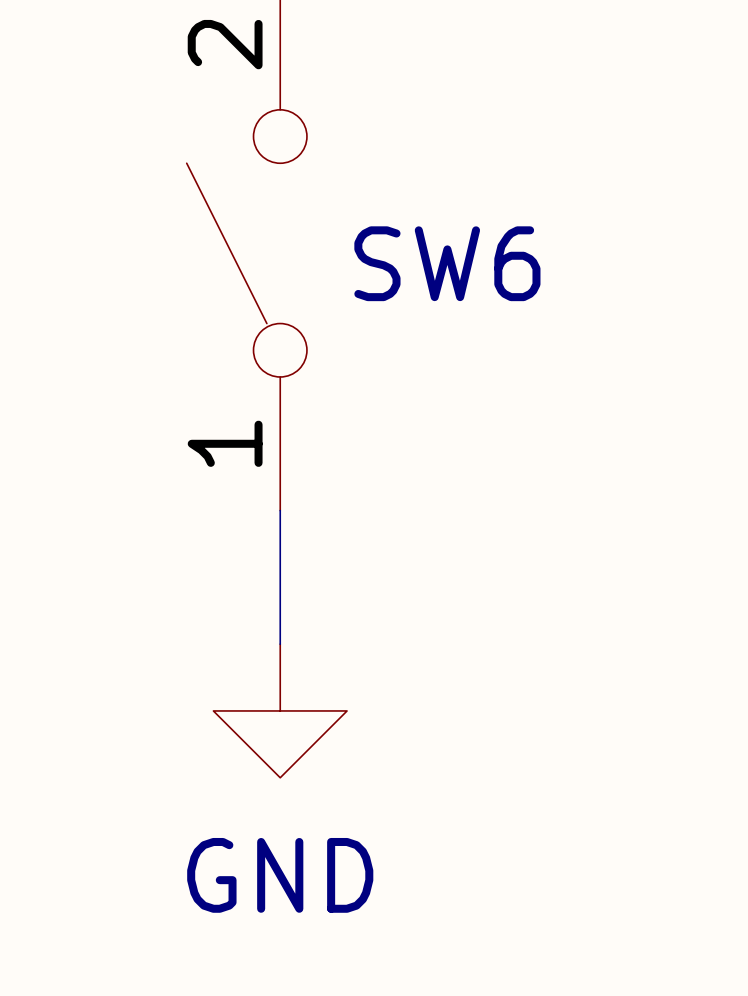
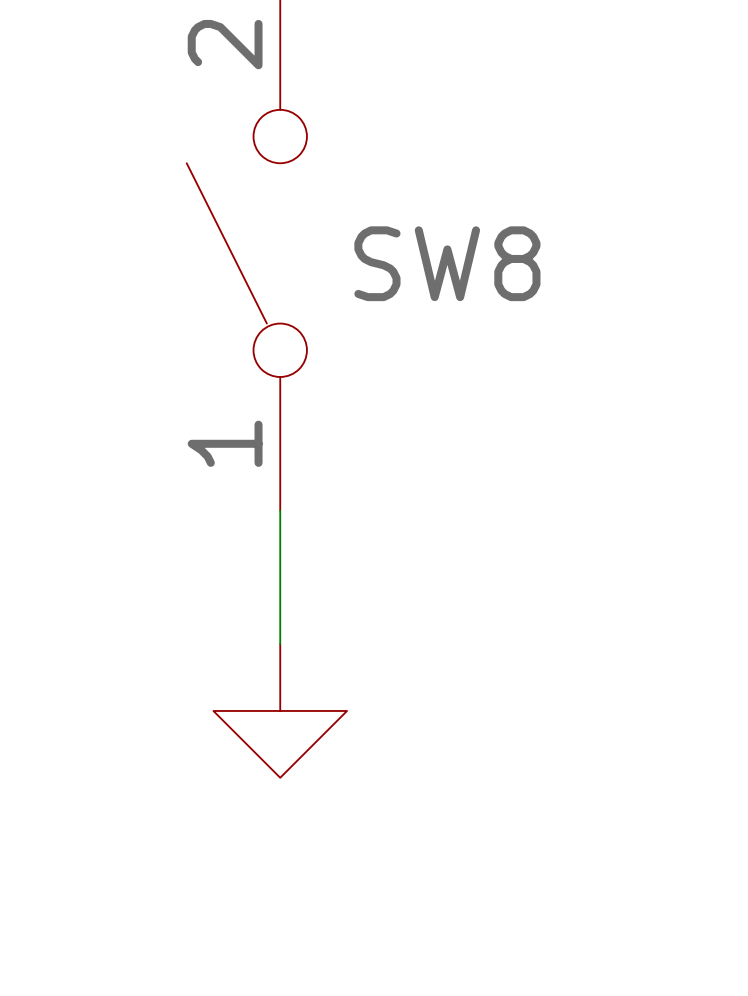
SW6 name: SW6 (447, 263) -> SW8 (447, 263)
power symbol text: GND (280, 875) -> none

